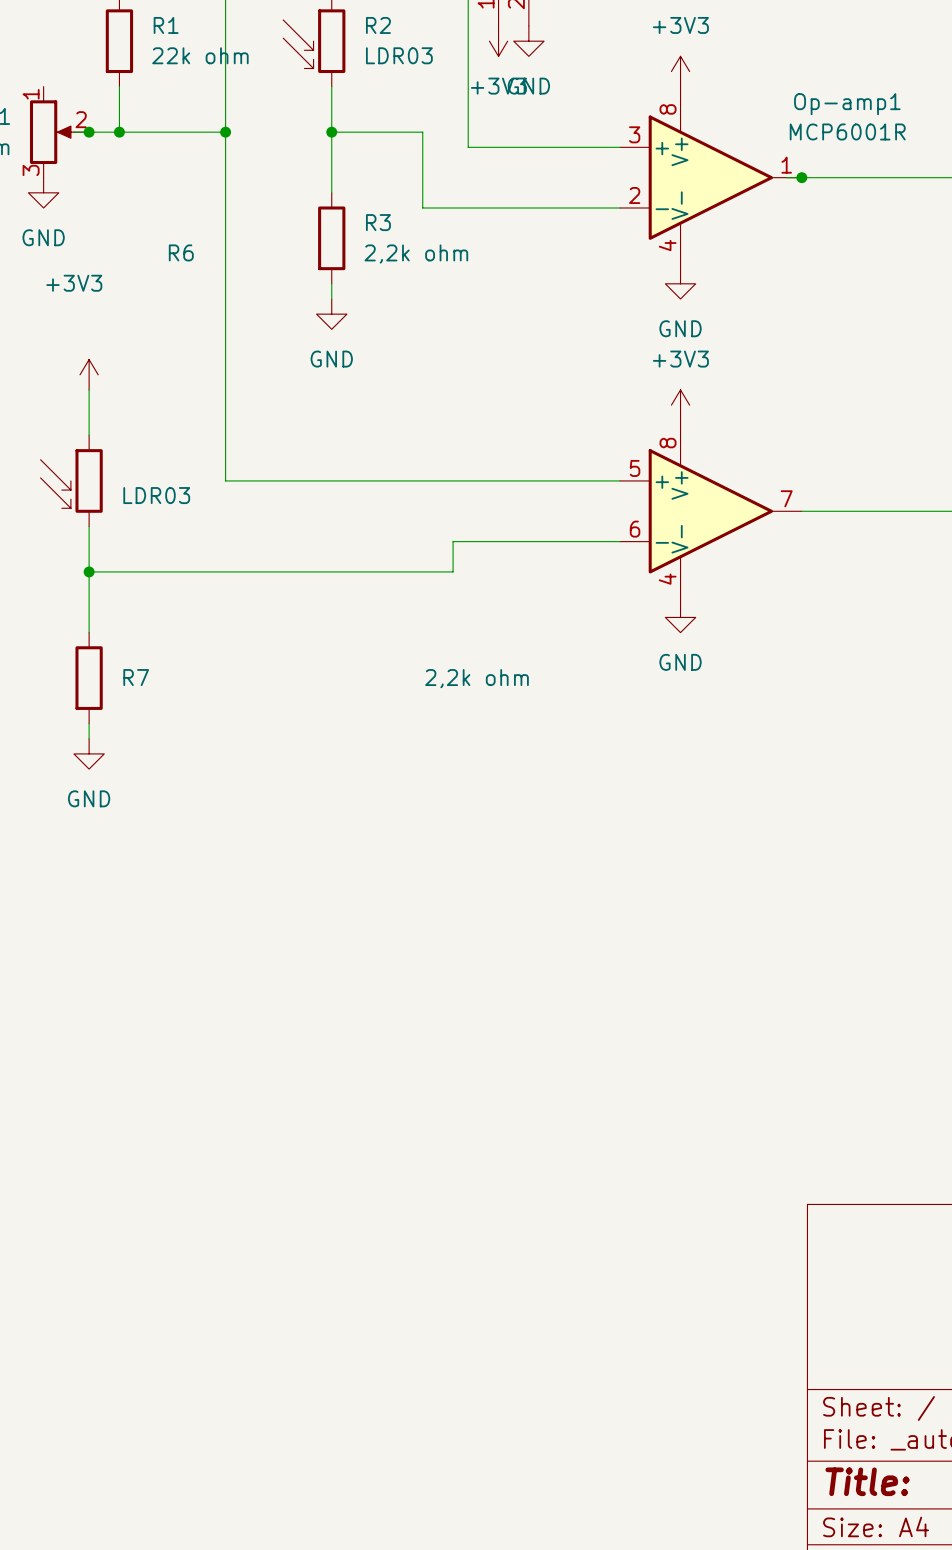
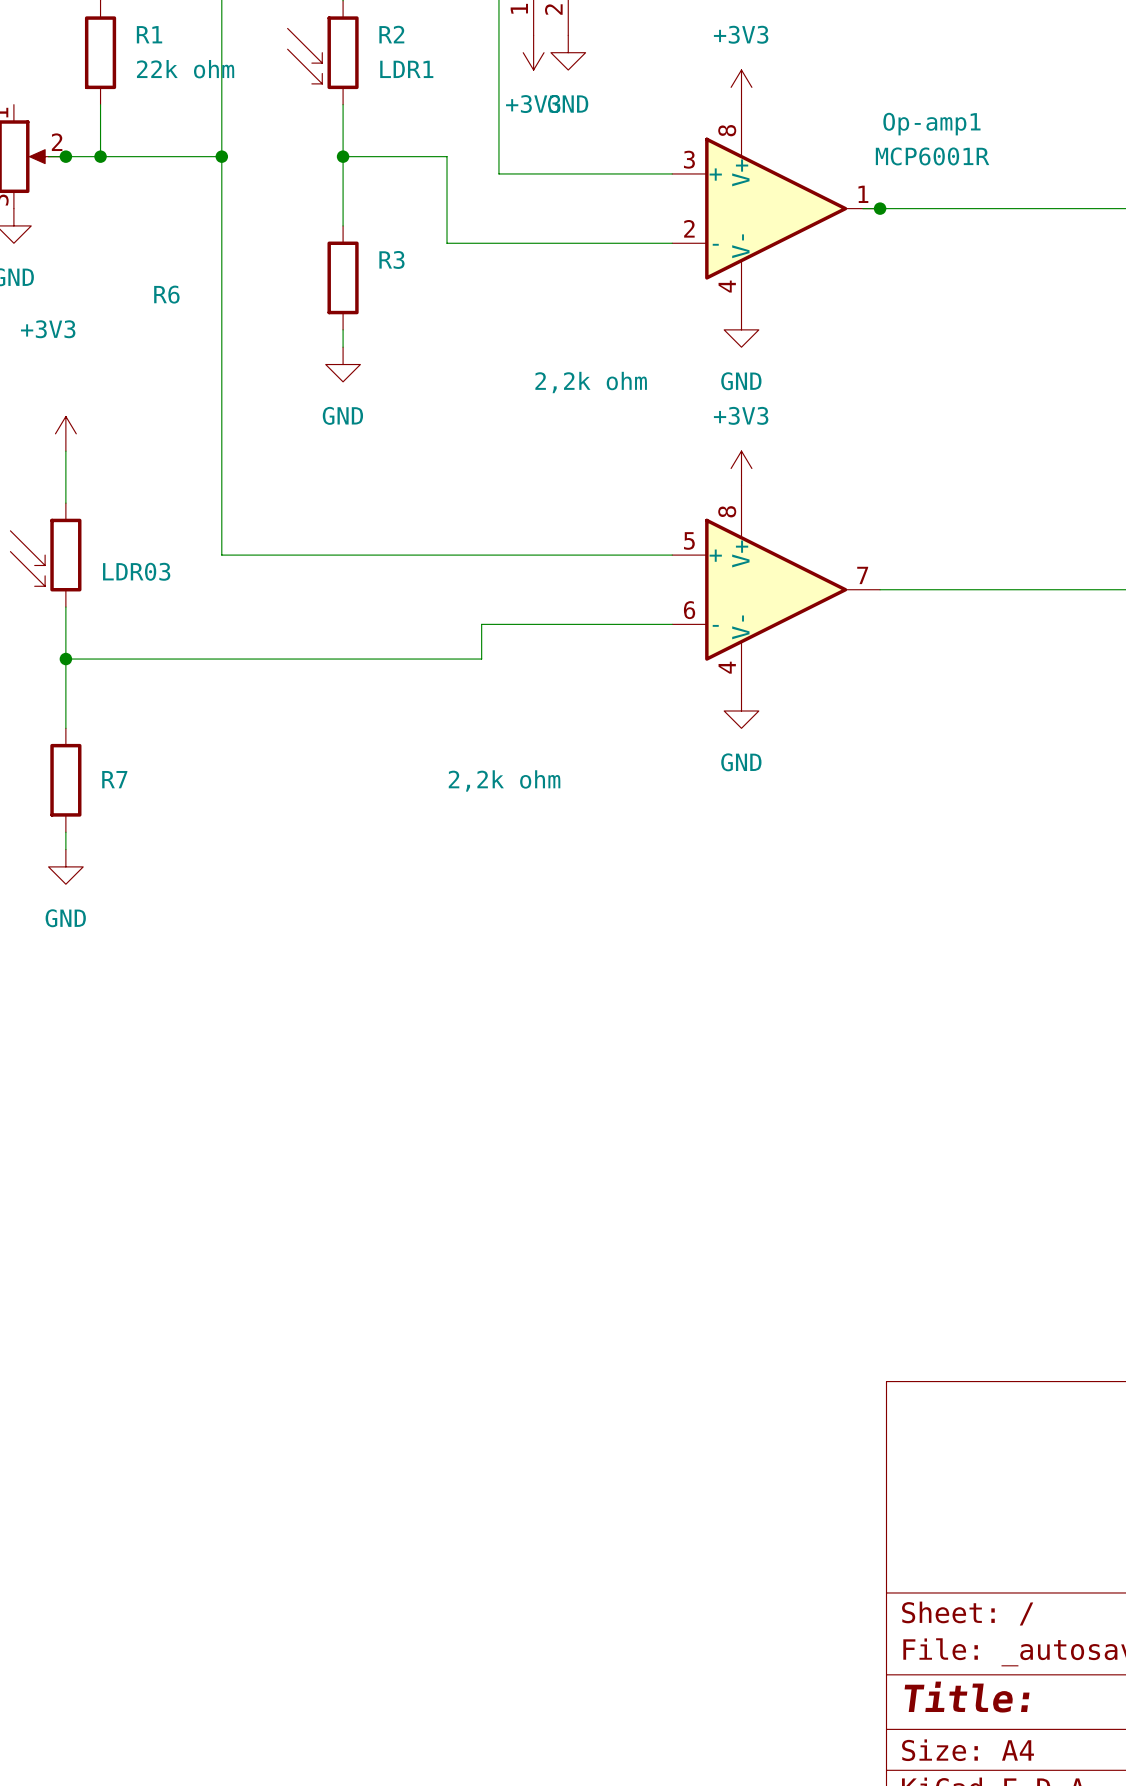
R2 value: LDR03 (399, 55) -> LDR1 (406, 69)
R3 value position: 2,2k ohm (416, 254) -> 2,2k ohm (591, 382)

